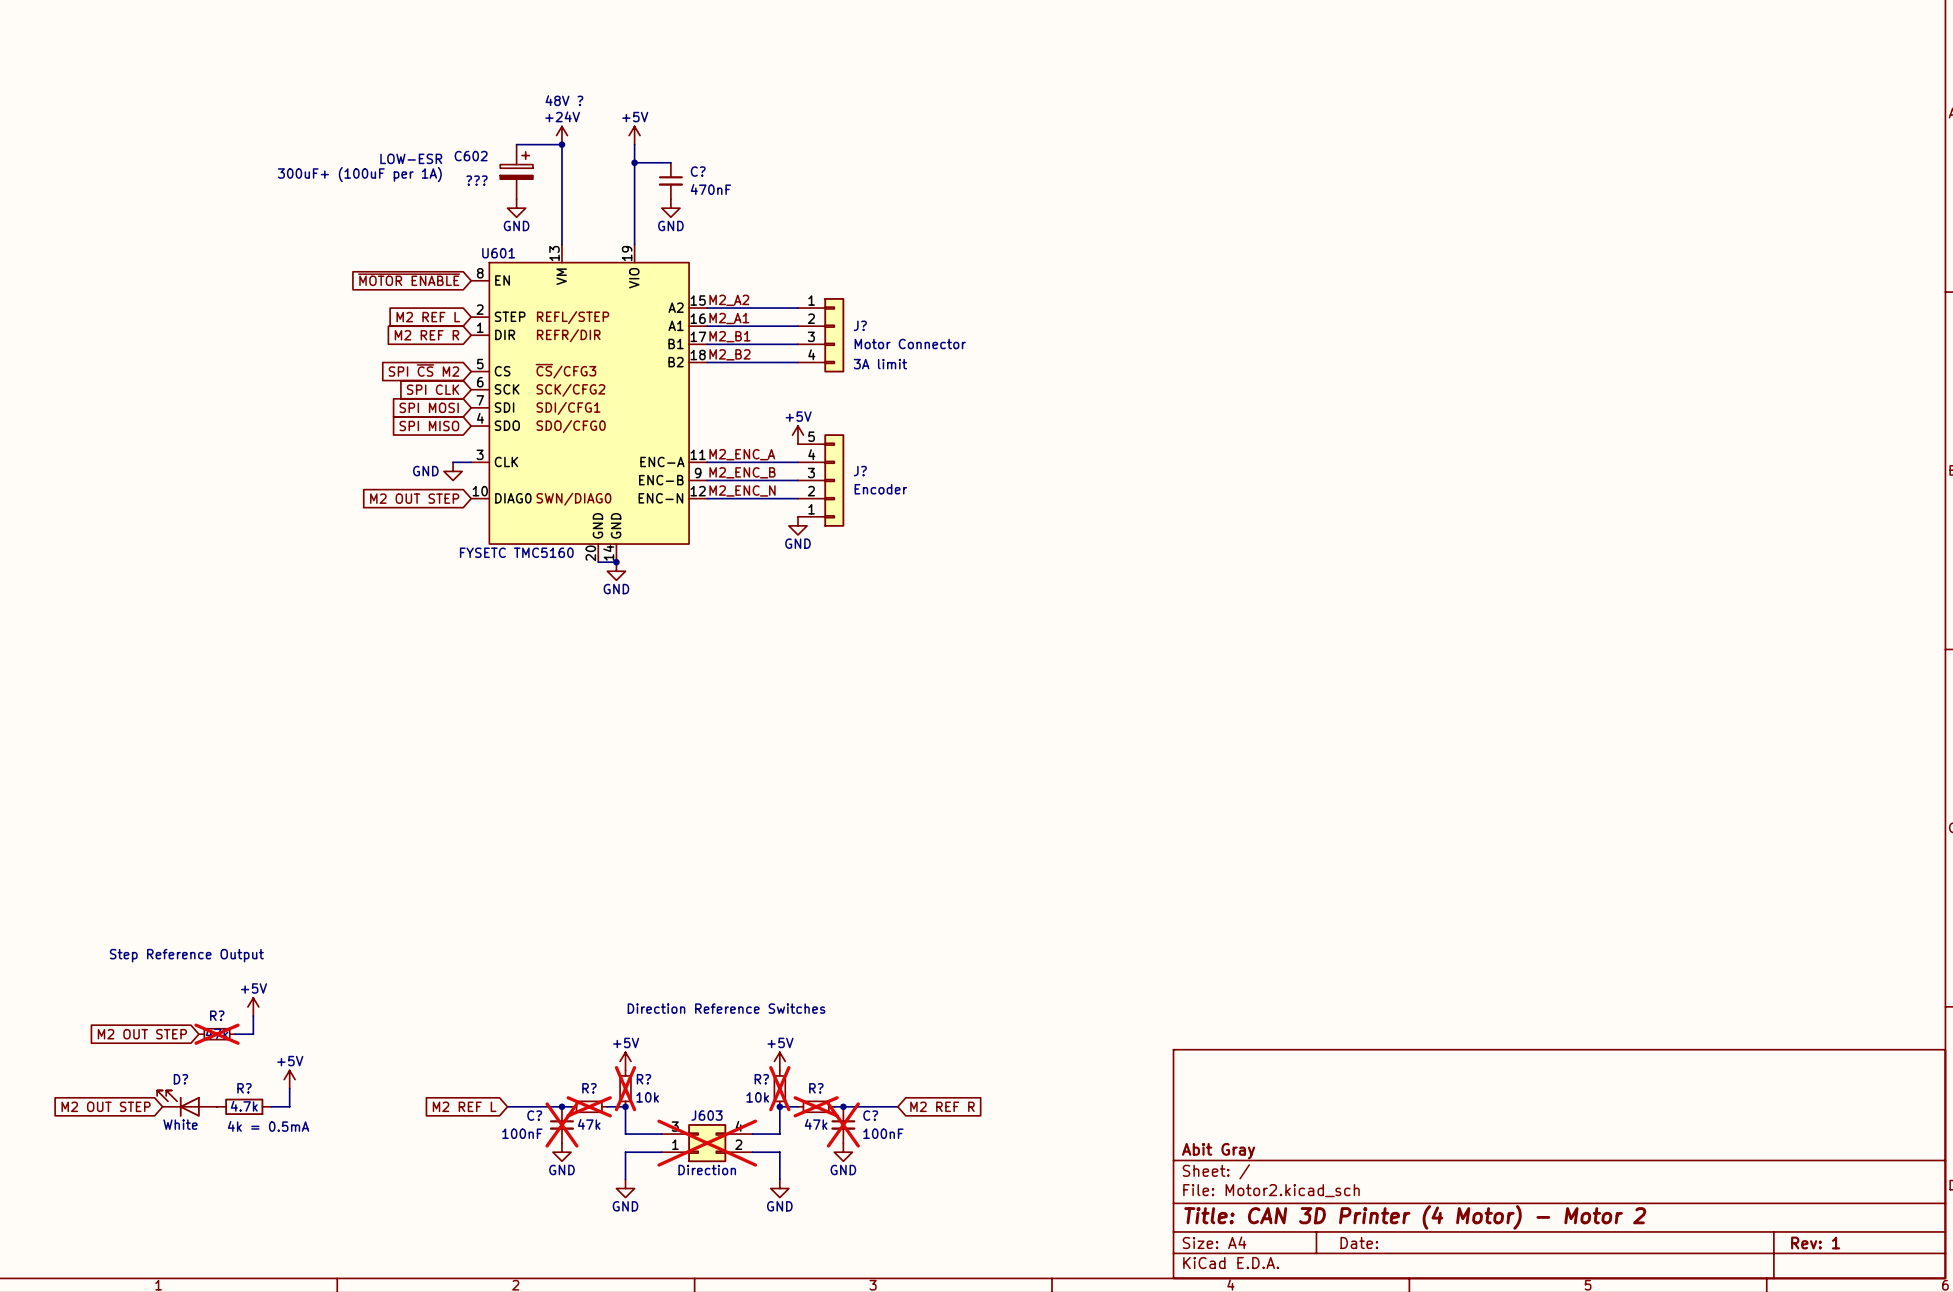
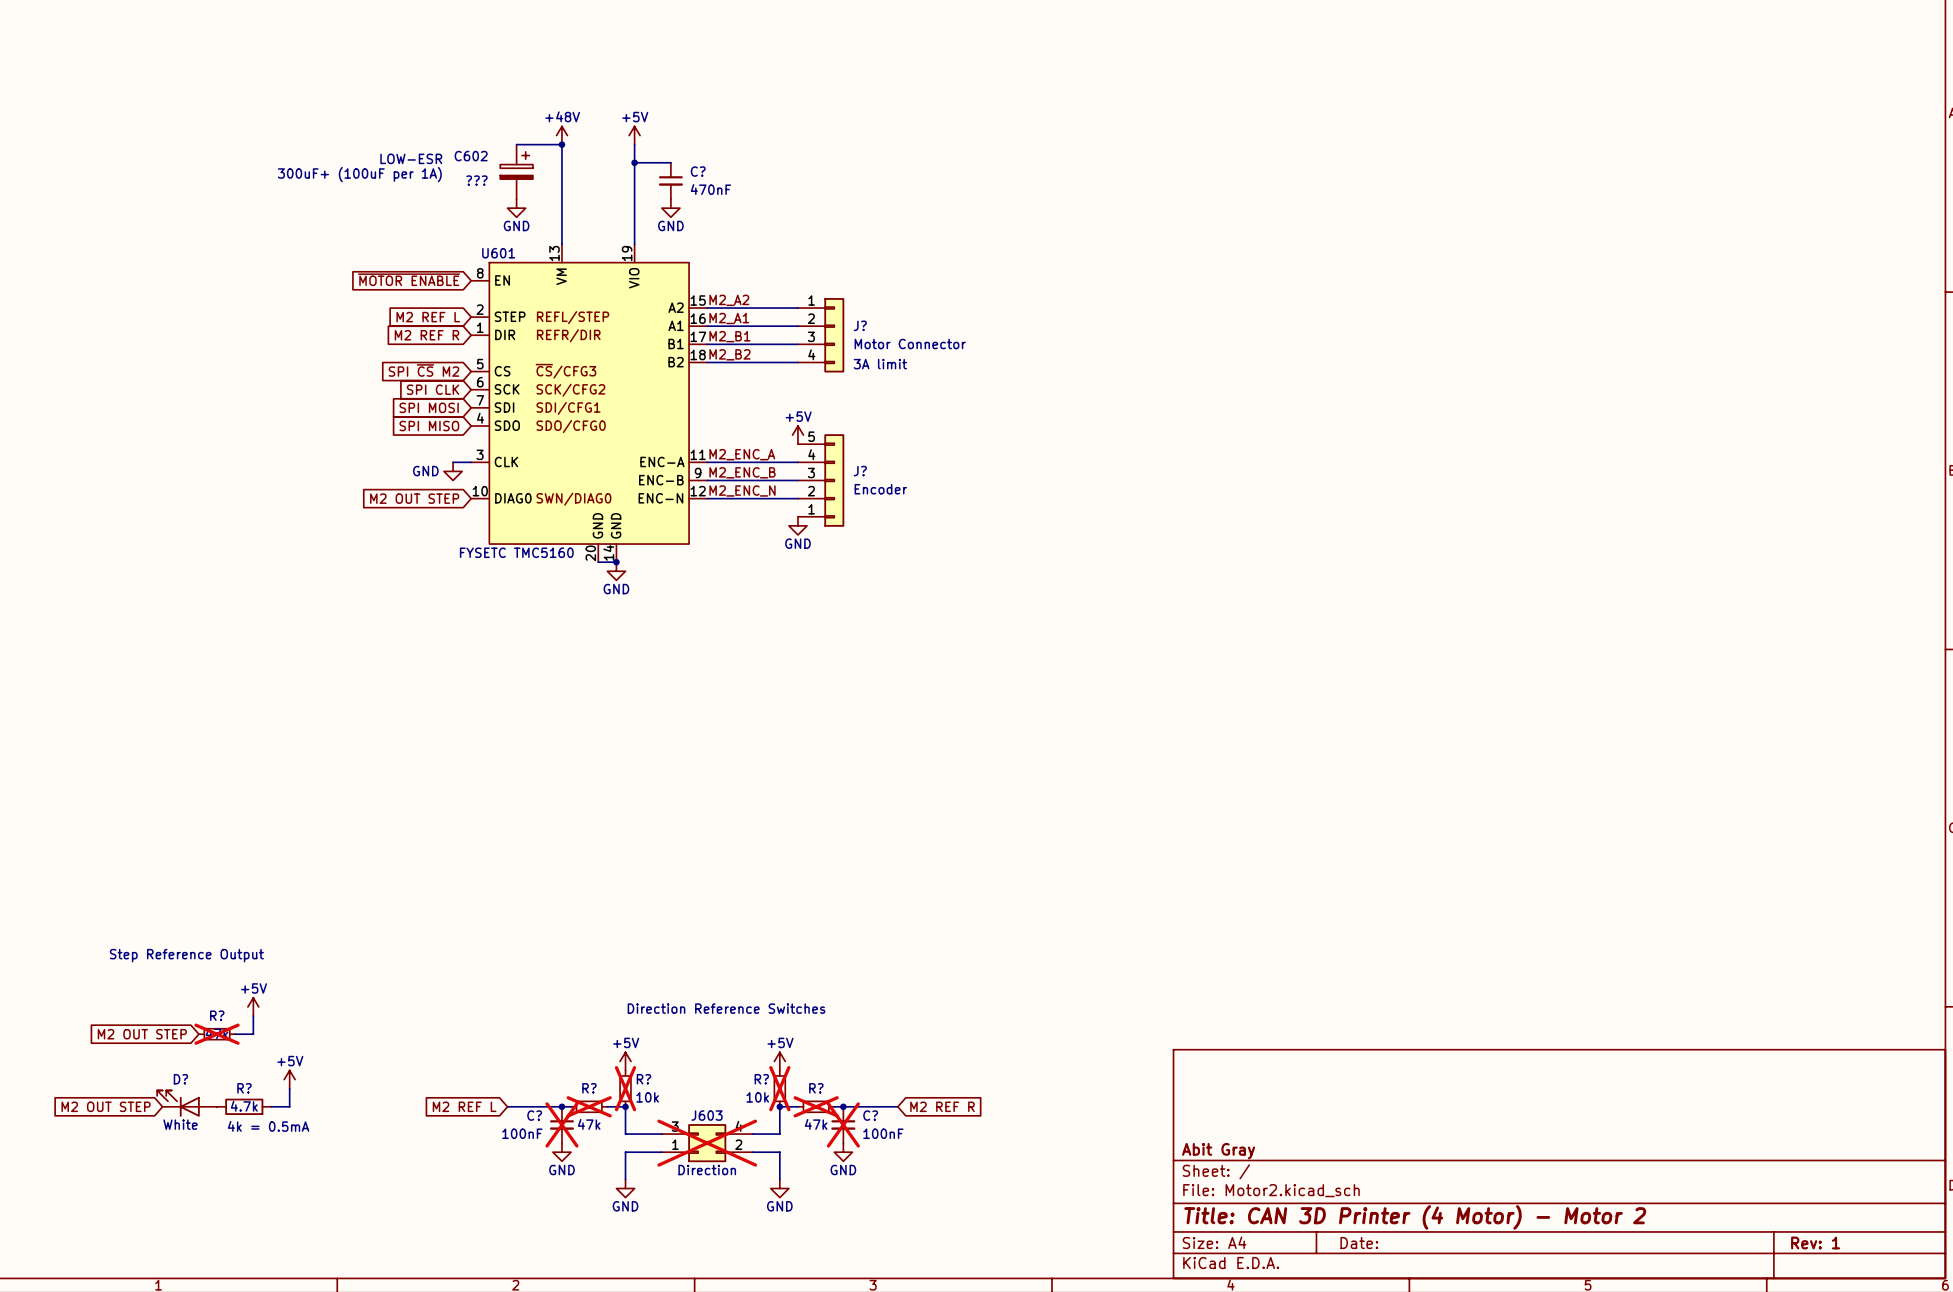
text: 48V ? (564, 100) -> none
power symbol: +24V (561, 135) -> +48V (561, 135)

